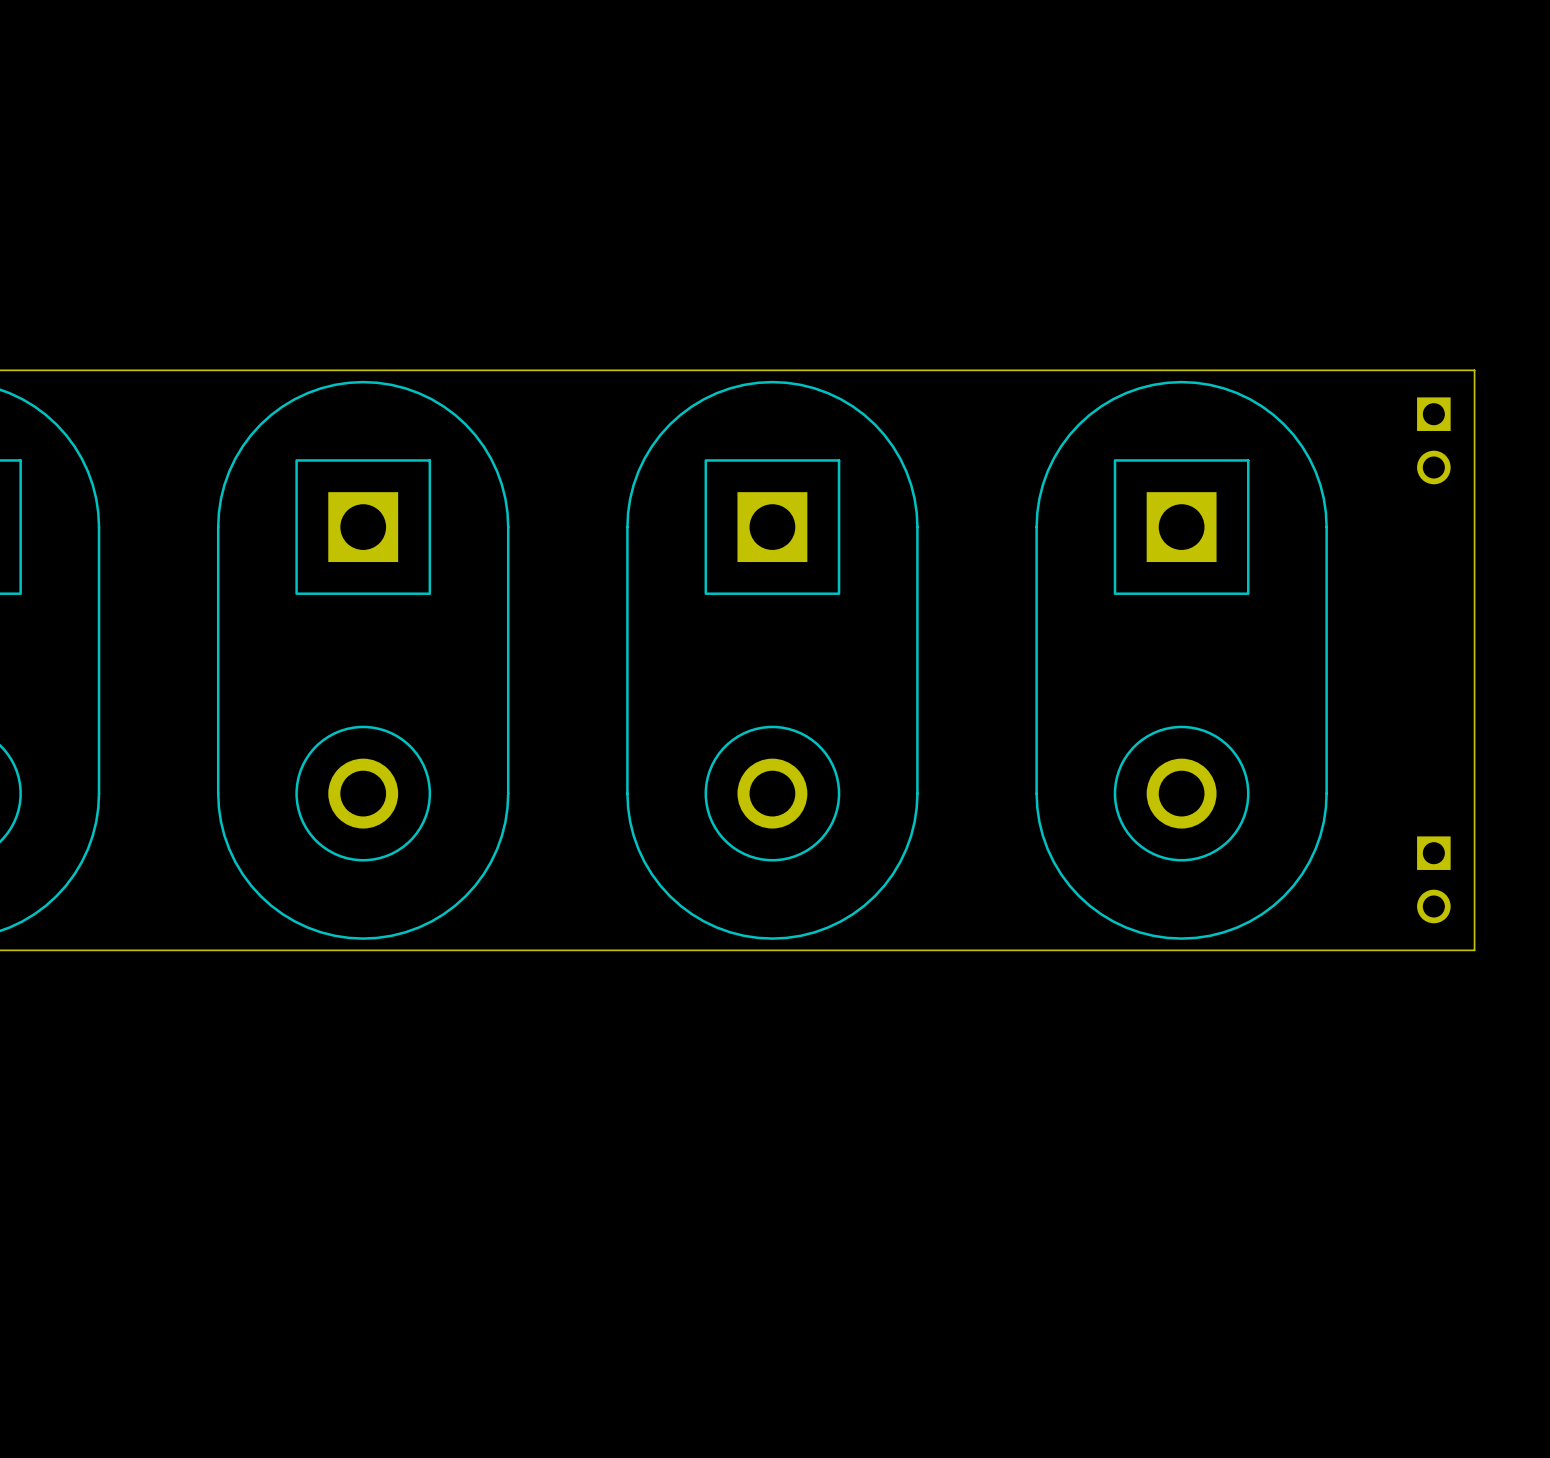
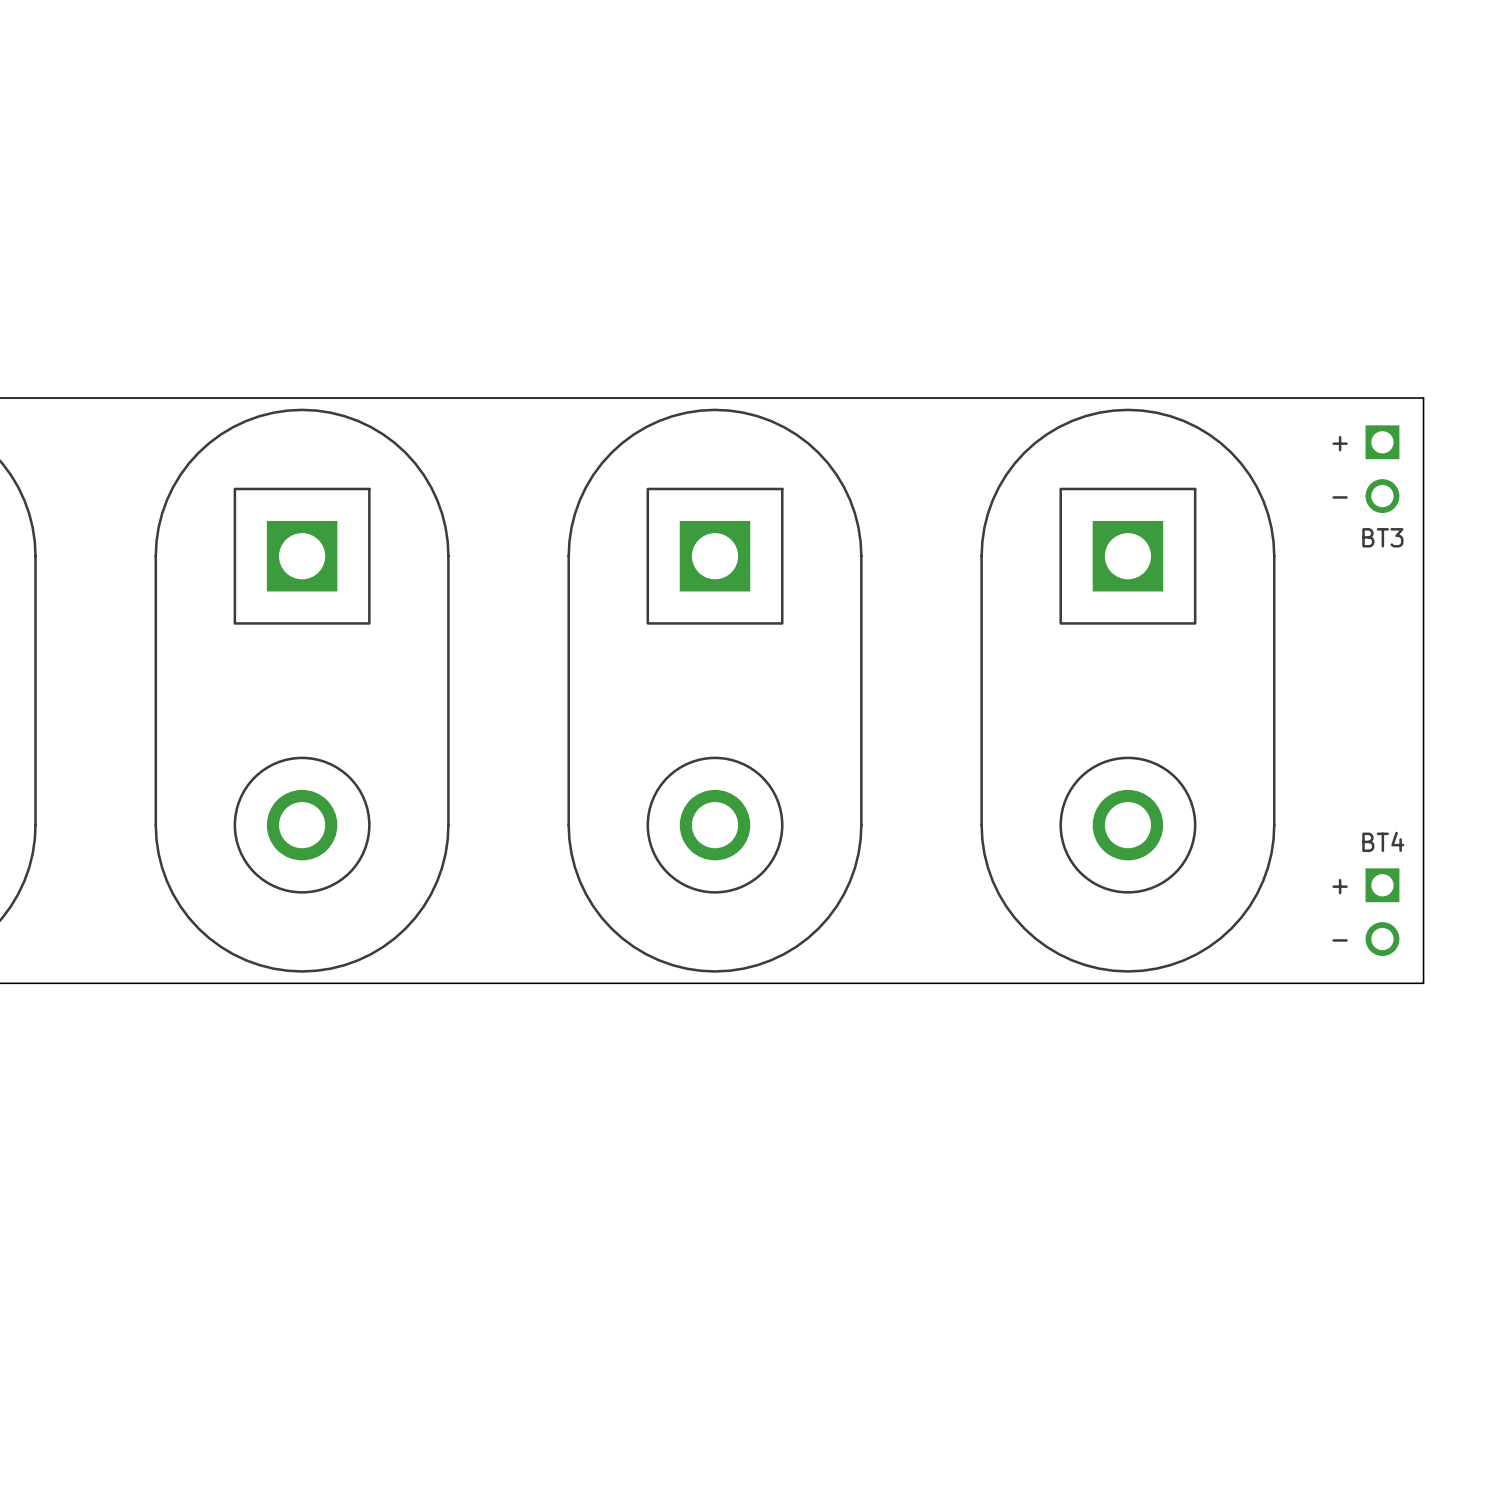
text: none -> + (1340, 443)
text: none -> - (1340, 497)
text: none -> BT3 (1382, 537)
text: none -> BT4 (1383, 841)
text: none -> + (1340, 886)
text: none -> - (1340, 940)

